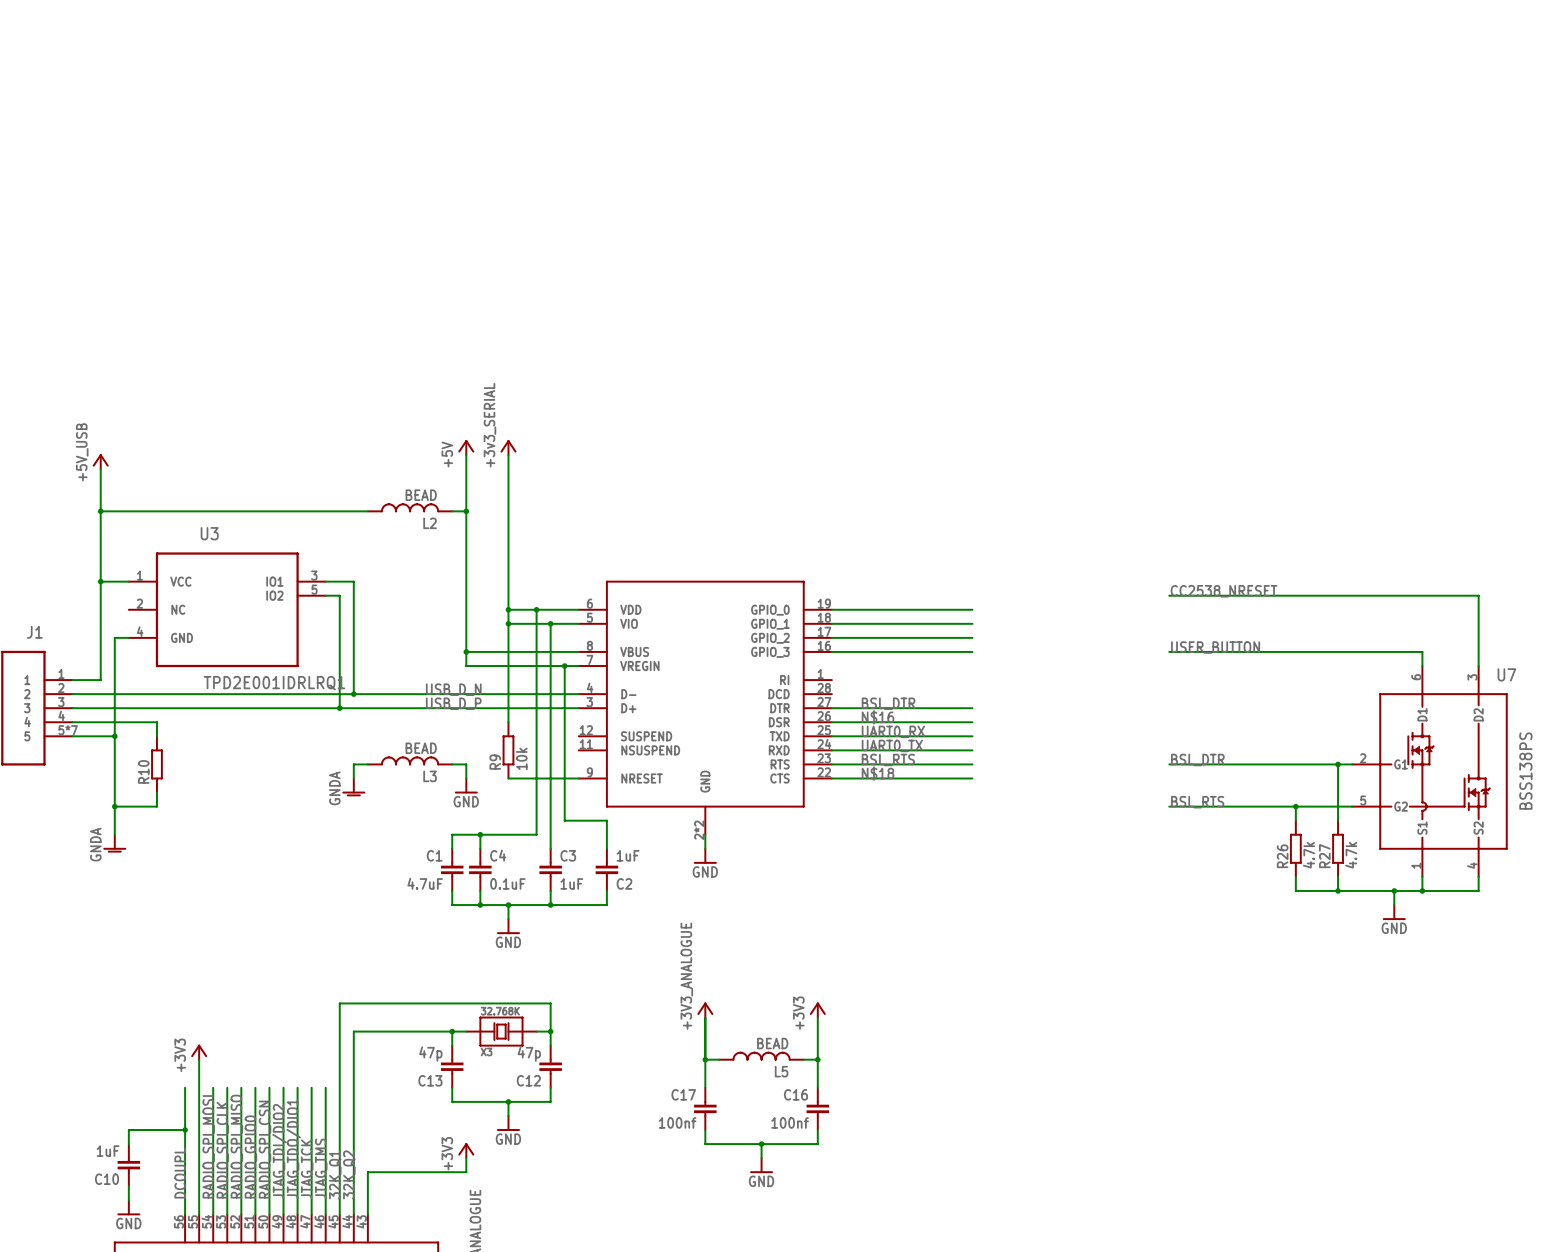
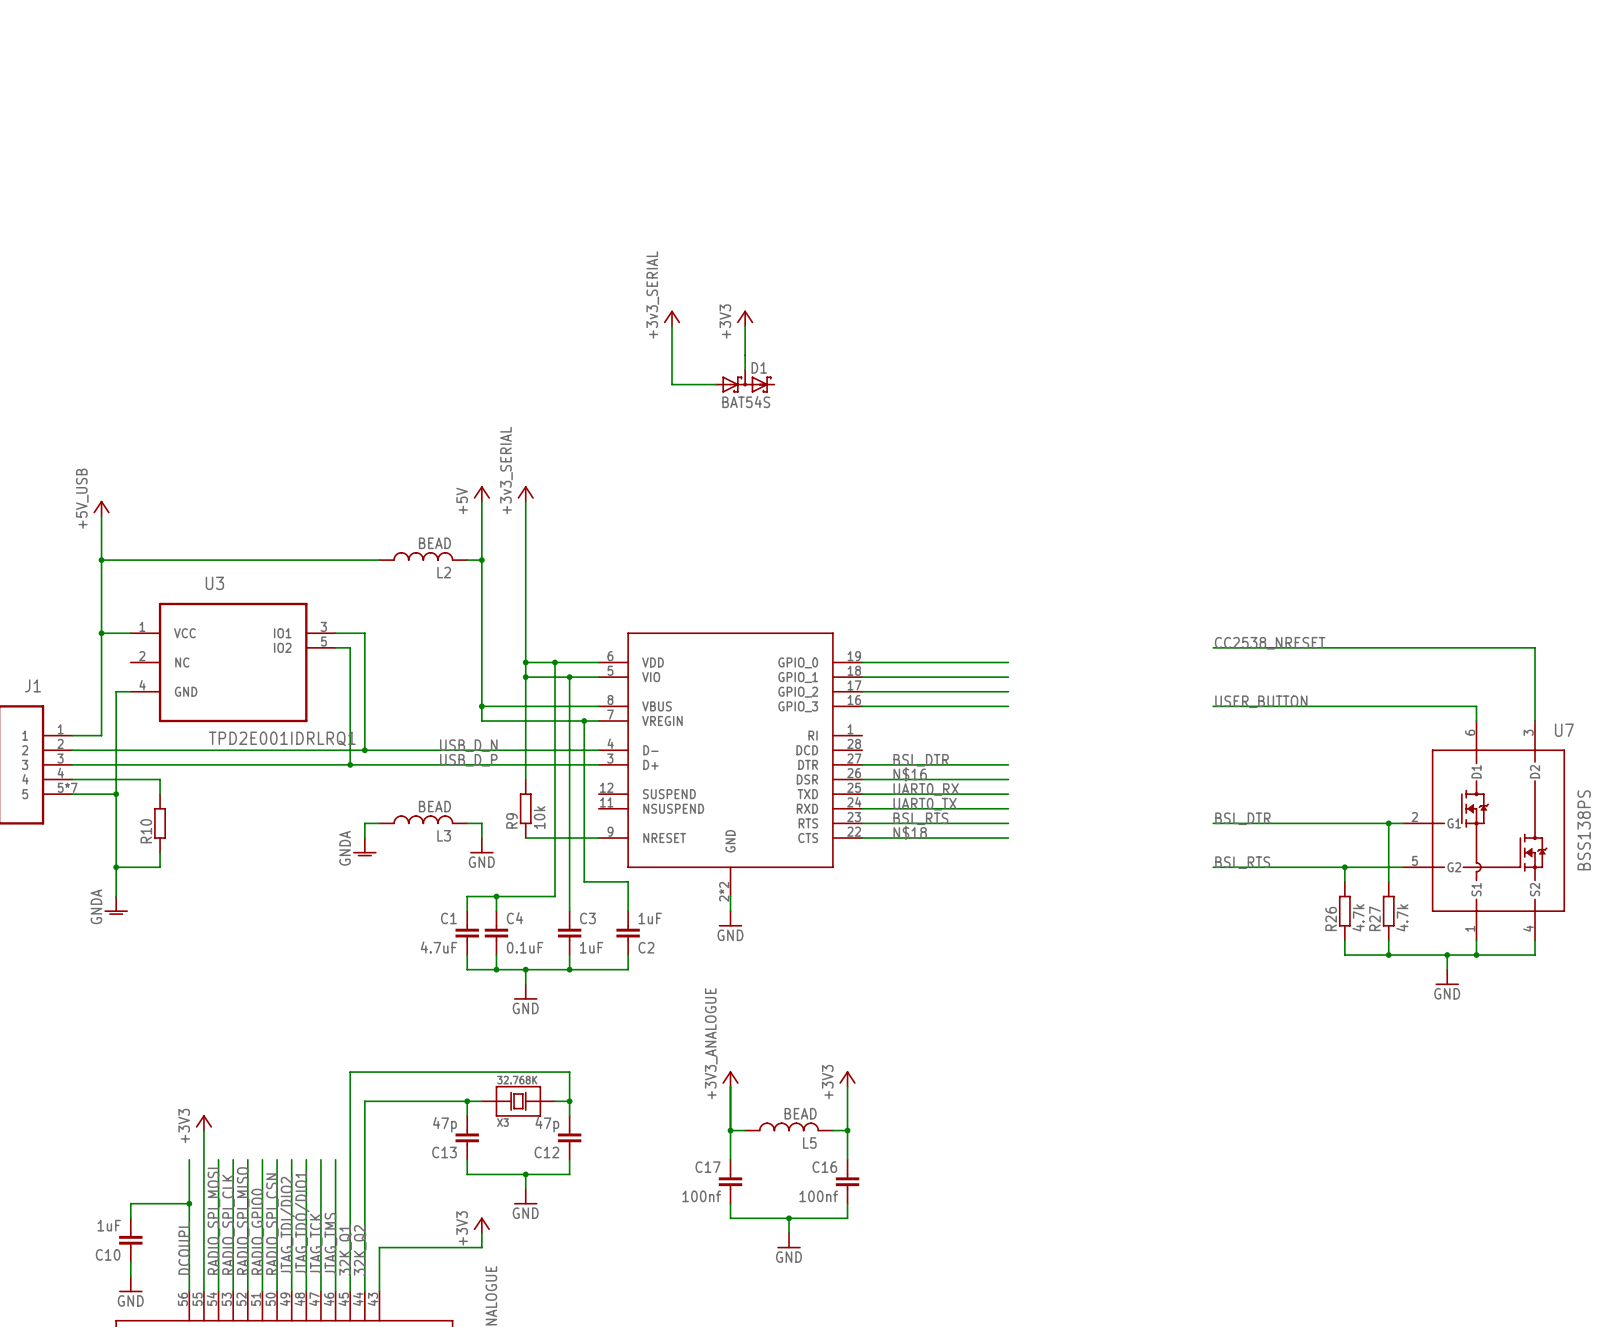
power symbol: none -> +3v3_SERIAL (672, 318)
power symbol: none -> +3V3 (745, 318)
wire: none -> (672, 326) (672, 384) (715, 384)
wire: none -> (745, 326) (745, 369)
D1: none -> BAT54S (745, 381)

